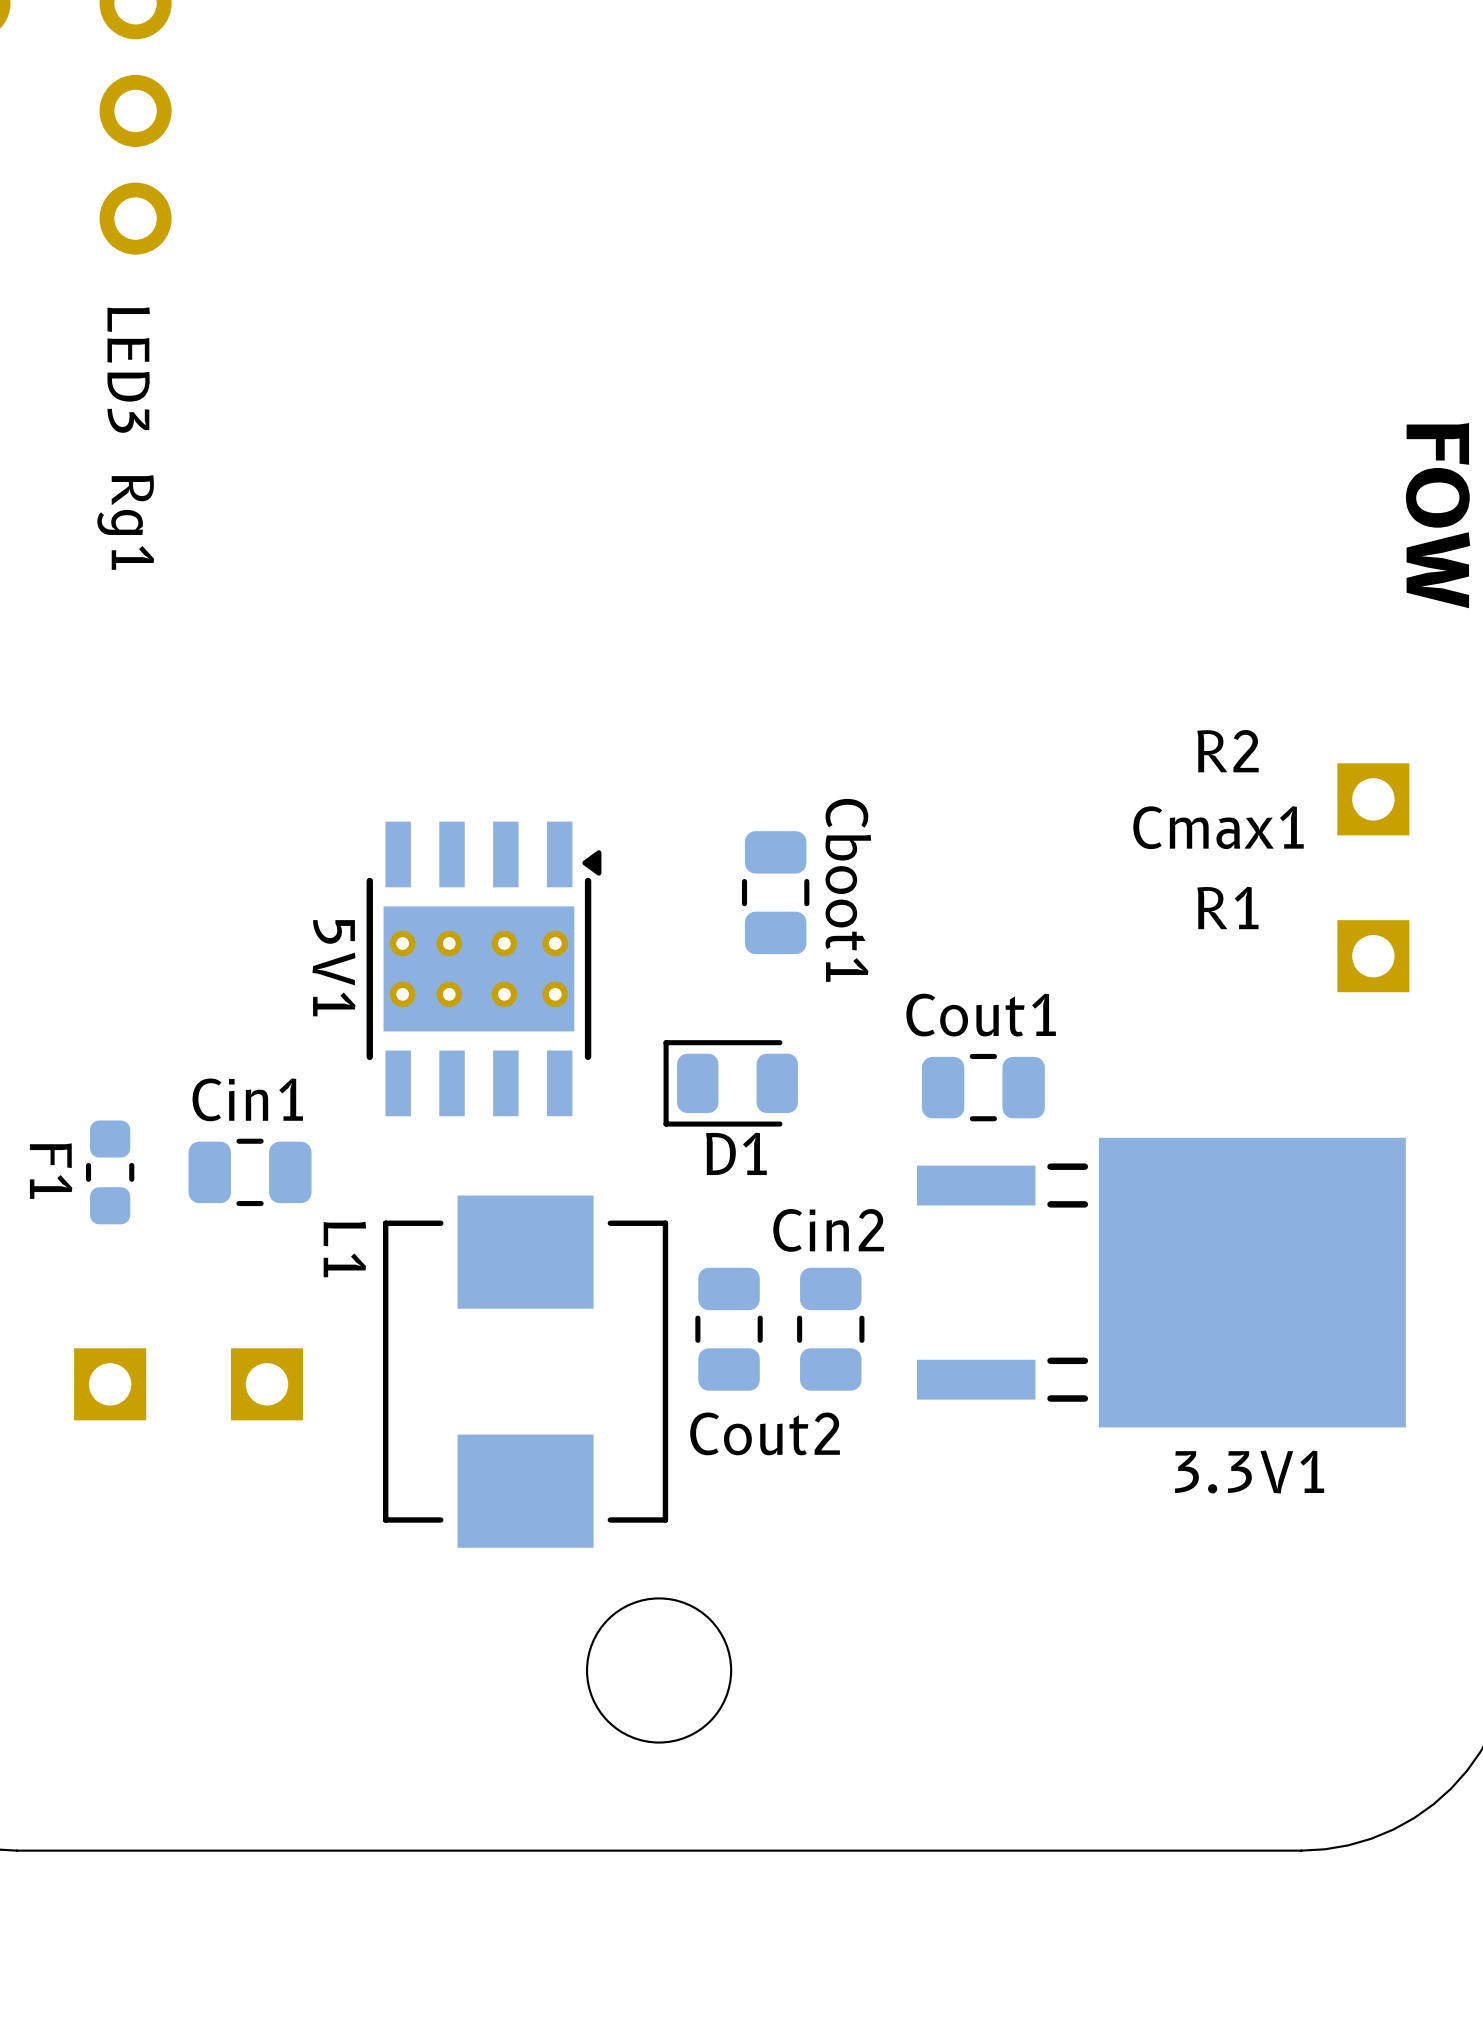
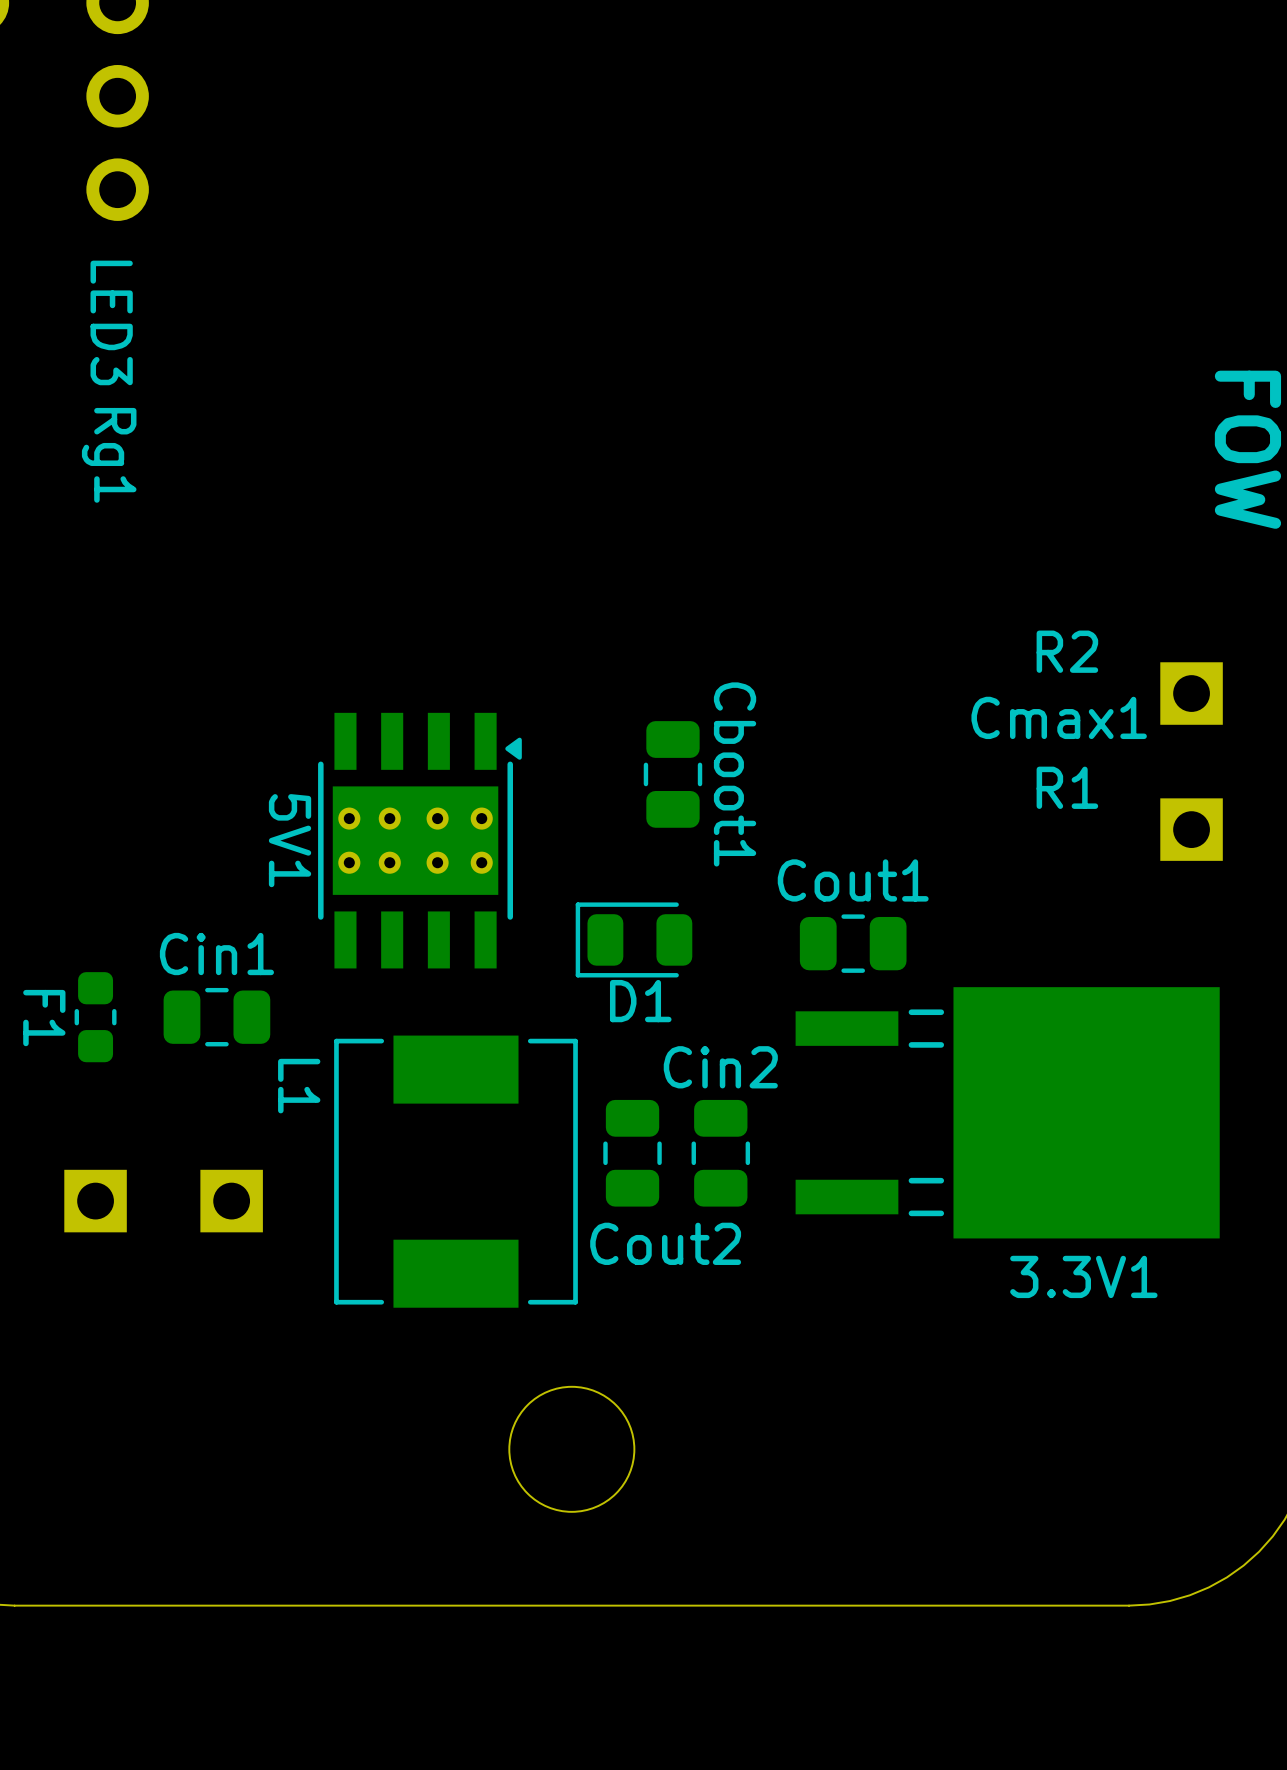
L1 footprint: [382, 1195, 669, 1548] -> [334, 1035, 578, 1308]

